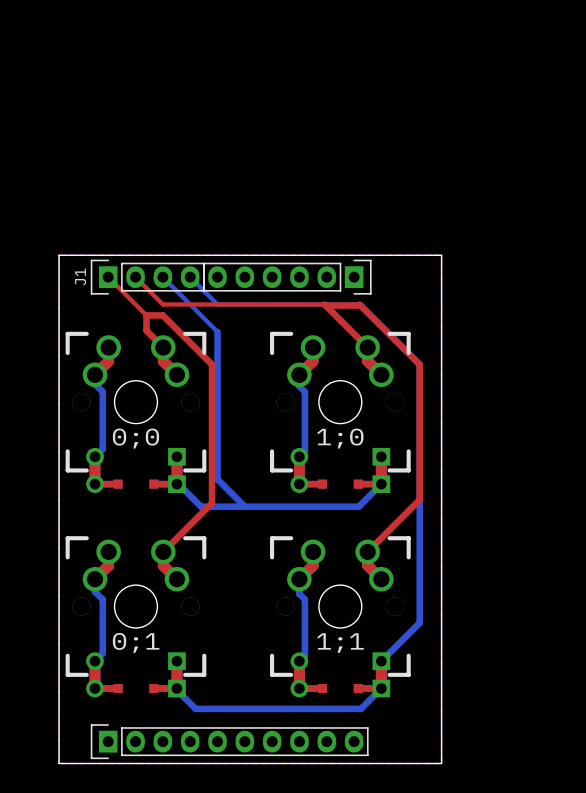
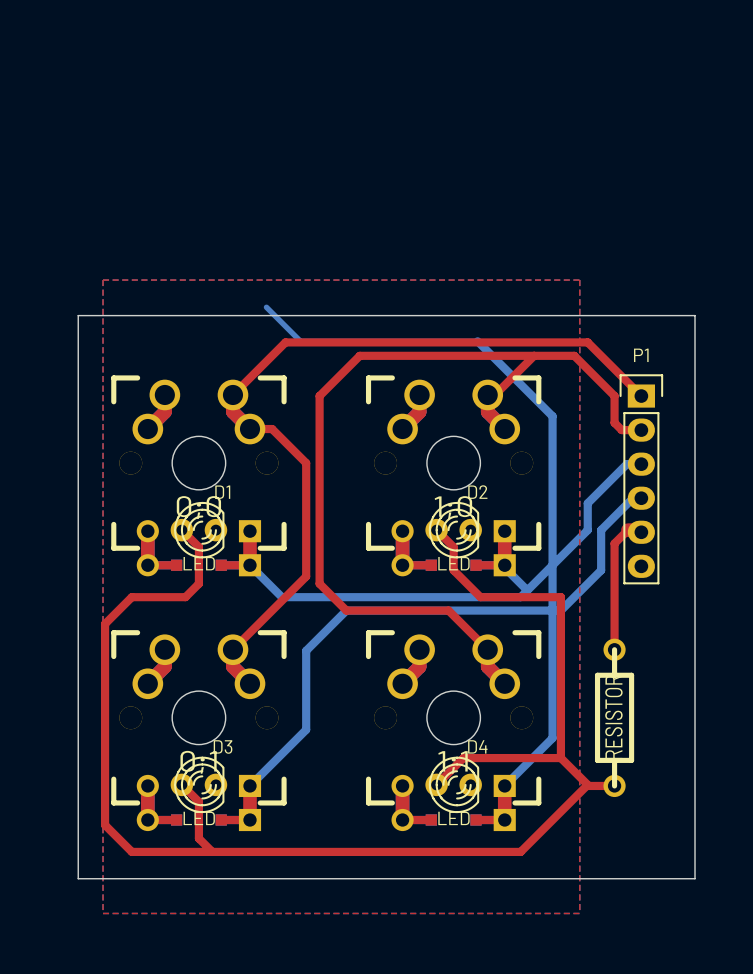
board edge: (59, 255) (441, 255) (441, 763) (59, 763) (59, 255) -> (78, 315) (78, 878) (695, 878) (695, 315) (78, 315)
top track: (108, 277) (146, 315) -> none
top track: (135, 277) (162, 304) (324, 304) (367, 347) -> (534, 355) (494, 394) (487, 394)
J1: (147, 277) -> none
bottom track: (162, 277) (217, 331) (217, 479) (244, 506) -> none
part: (287, 277) -> none
top track: (325, 305) (360, 305) (419, 364) (419, 499) (367, 551) -> (641, 430) (621, 430) (614, 422) (614, 396) (574, 355) (359, 355) (319, 396) (319, 583) (346, 610) (448, 610) (487, 649)
top track: (146, 315) (162, 315) (212, 364) (212, 503) -> (250, 429) (272, 429) (306, 463) (306, 576) (293, 588)
top track: (146, 315) (146, 330) (163, 347) -> (641, 396) (587, 342) (285, 342) (232, 394)
bottom track: (94, 374) (94, 384) (102, 391) (102, 449) (94, 456) -> none
bottom track: (299, 374) (299, 386) (304, 391) (304, 451) (299, 456) -> none
bottom track: none -> (641, 464) (626, 464) (587, 503) (587, 530) (520, 597) (281, 597) (250, 565)
P1: none -> (641, 479)
top track: none -> (181, 530) (198, 547) (198, 583) (185, 597) (131, 597) (105, 623) (105, 825) (131, 851) (520, 851) (586, 785) (614, 785)
D1: none -> LED (198, 530)
top track: none -> (436, 530) (453, 547) (453, 570) (480, 597) (560, 597) (560, 758)
D2: none -> LED (453, 530)
bottom track: (176, 456) (176, 484) (201, 506) (358, 506) (381, 484) (381, 456) -> none
top track: none -> (641, 532) (641, 530) (627, 530) (614, 543) (614, 649)
bottom track: none -> (504, 565) (504, 567) (527, 590)
bottom track: (94, 579) (94, 591) (102, 599) (102, 653) (94, 661) -> none
bottom track: (299, 579) (299, 594) (304, 599) (304, 655) (299, 661) -> none
part: none -> RESISTOR (614, 717)
top track: none -> (560, 758) (463, 758) (436, 784)
top track: none -> (560, 758) (588, 785)
top track: none -> (181, 784) (198, 801) (198, 838) (212, 851)
D3: none -> LED (198, 784)
D4: none -> LED (453, 784)
bottom track: (176, 661) (176, 690) (195, 708) (360, 708) (381, 688) (381, 661) -> (250, 785) (306, 729) (306, 650) (346, 610) (560, 610) (601, 570) (601, 530) (633, 498) (641, 498)
part: (229, 741) -> none

